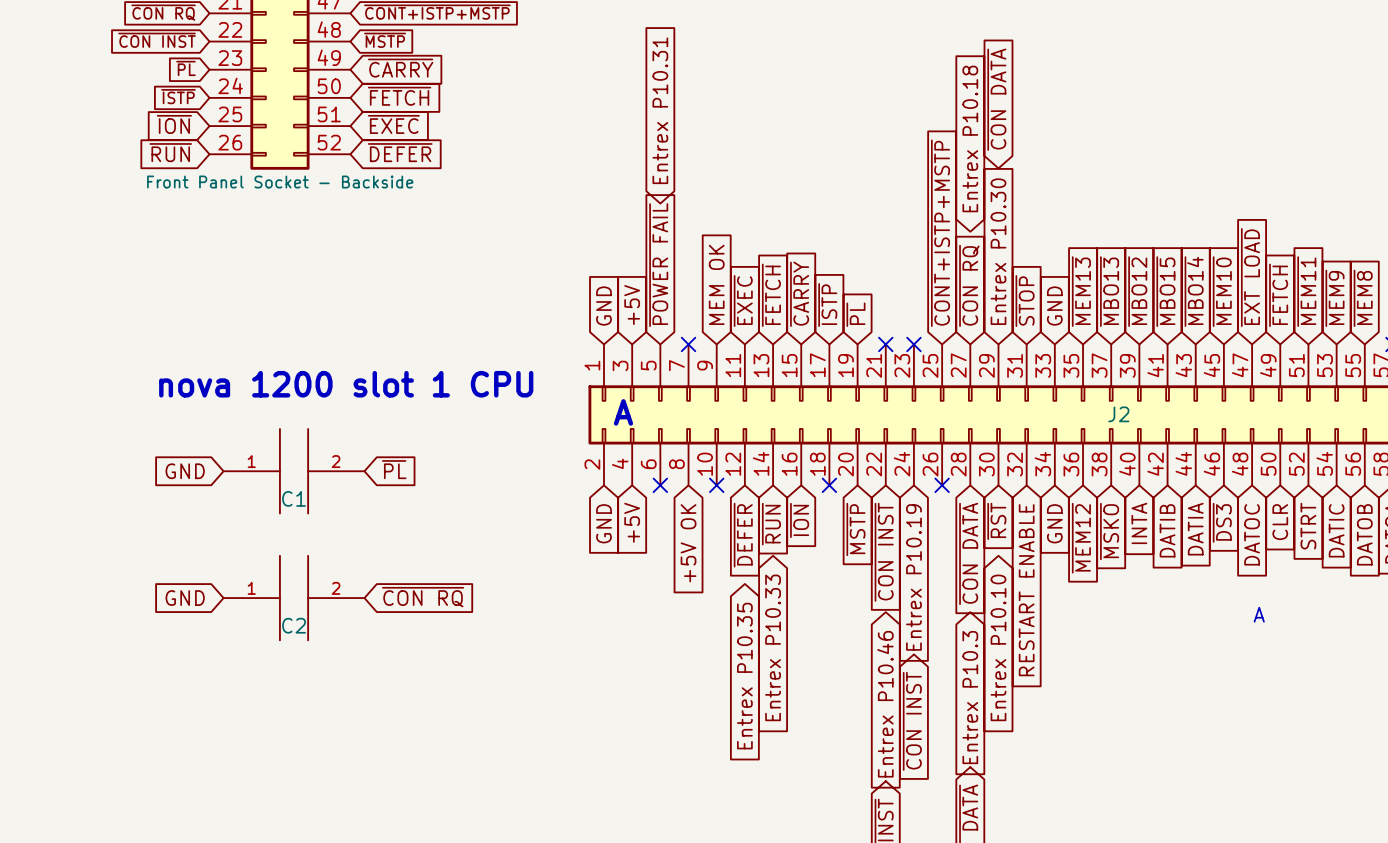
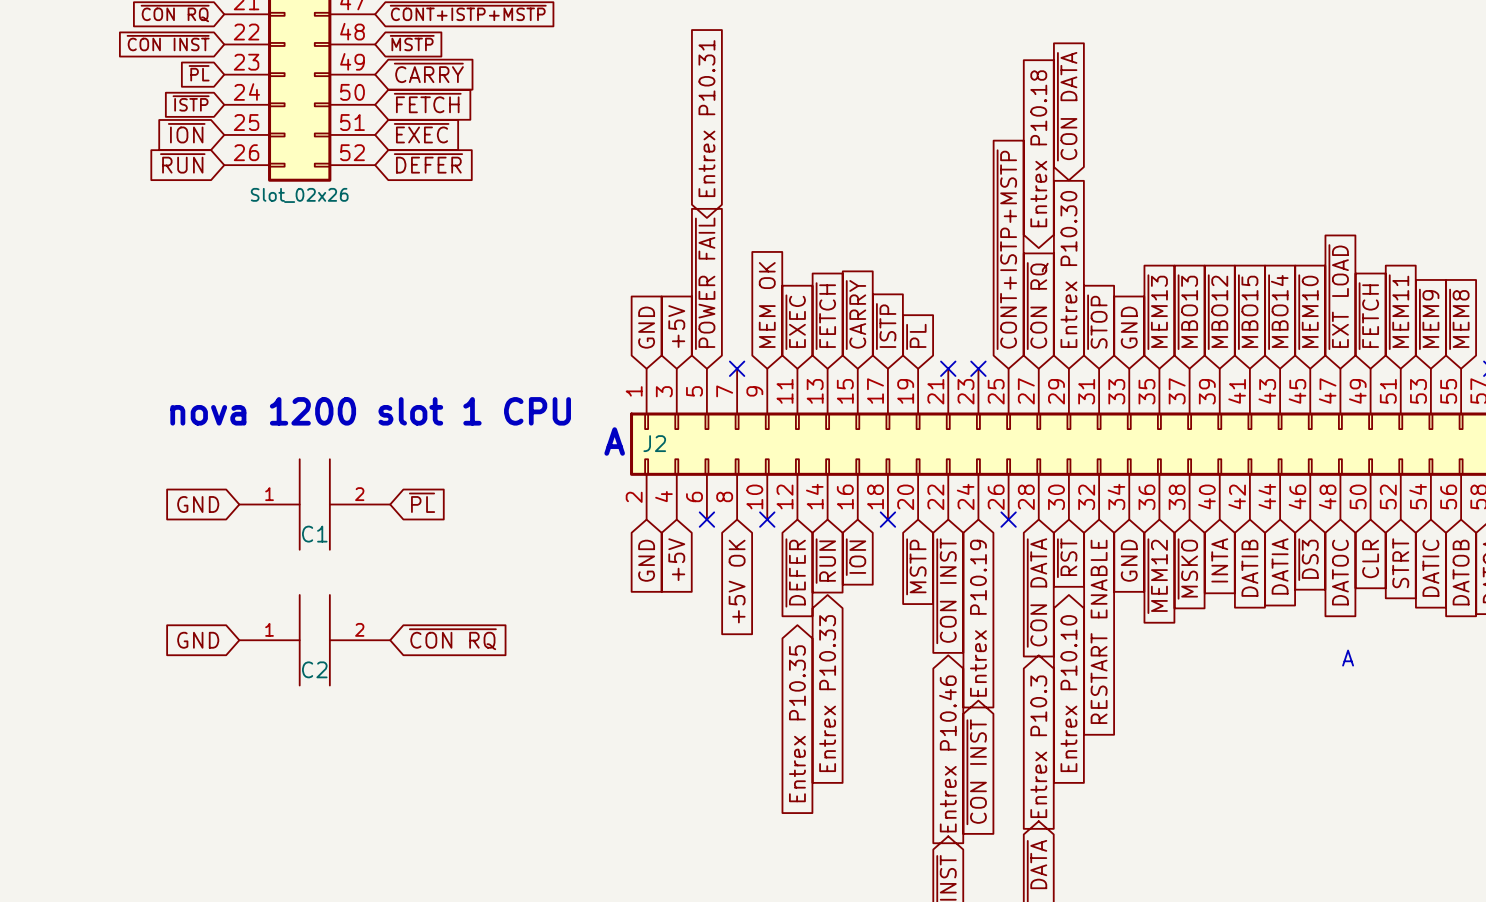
part value: Front Panel Socket - Backside (280, 182) -> Slot_02x26 (299, 195)
text position: A (623, 412) -> A (614, 441)
J2 name position: J2 (1118, 414) -> J2 (654, 443)

